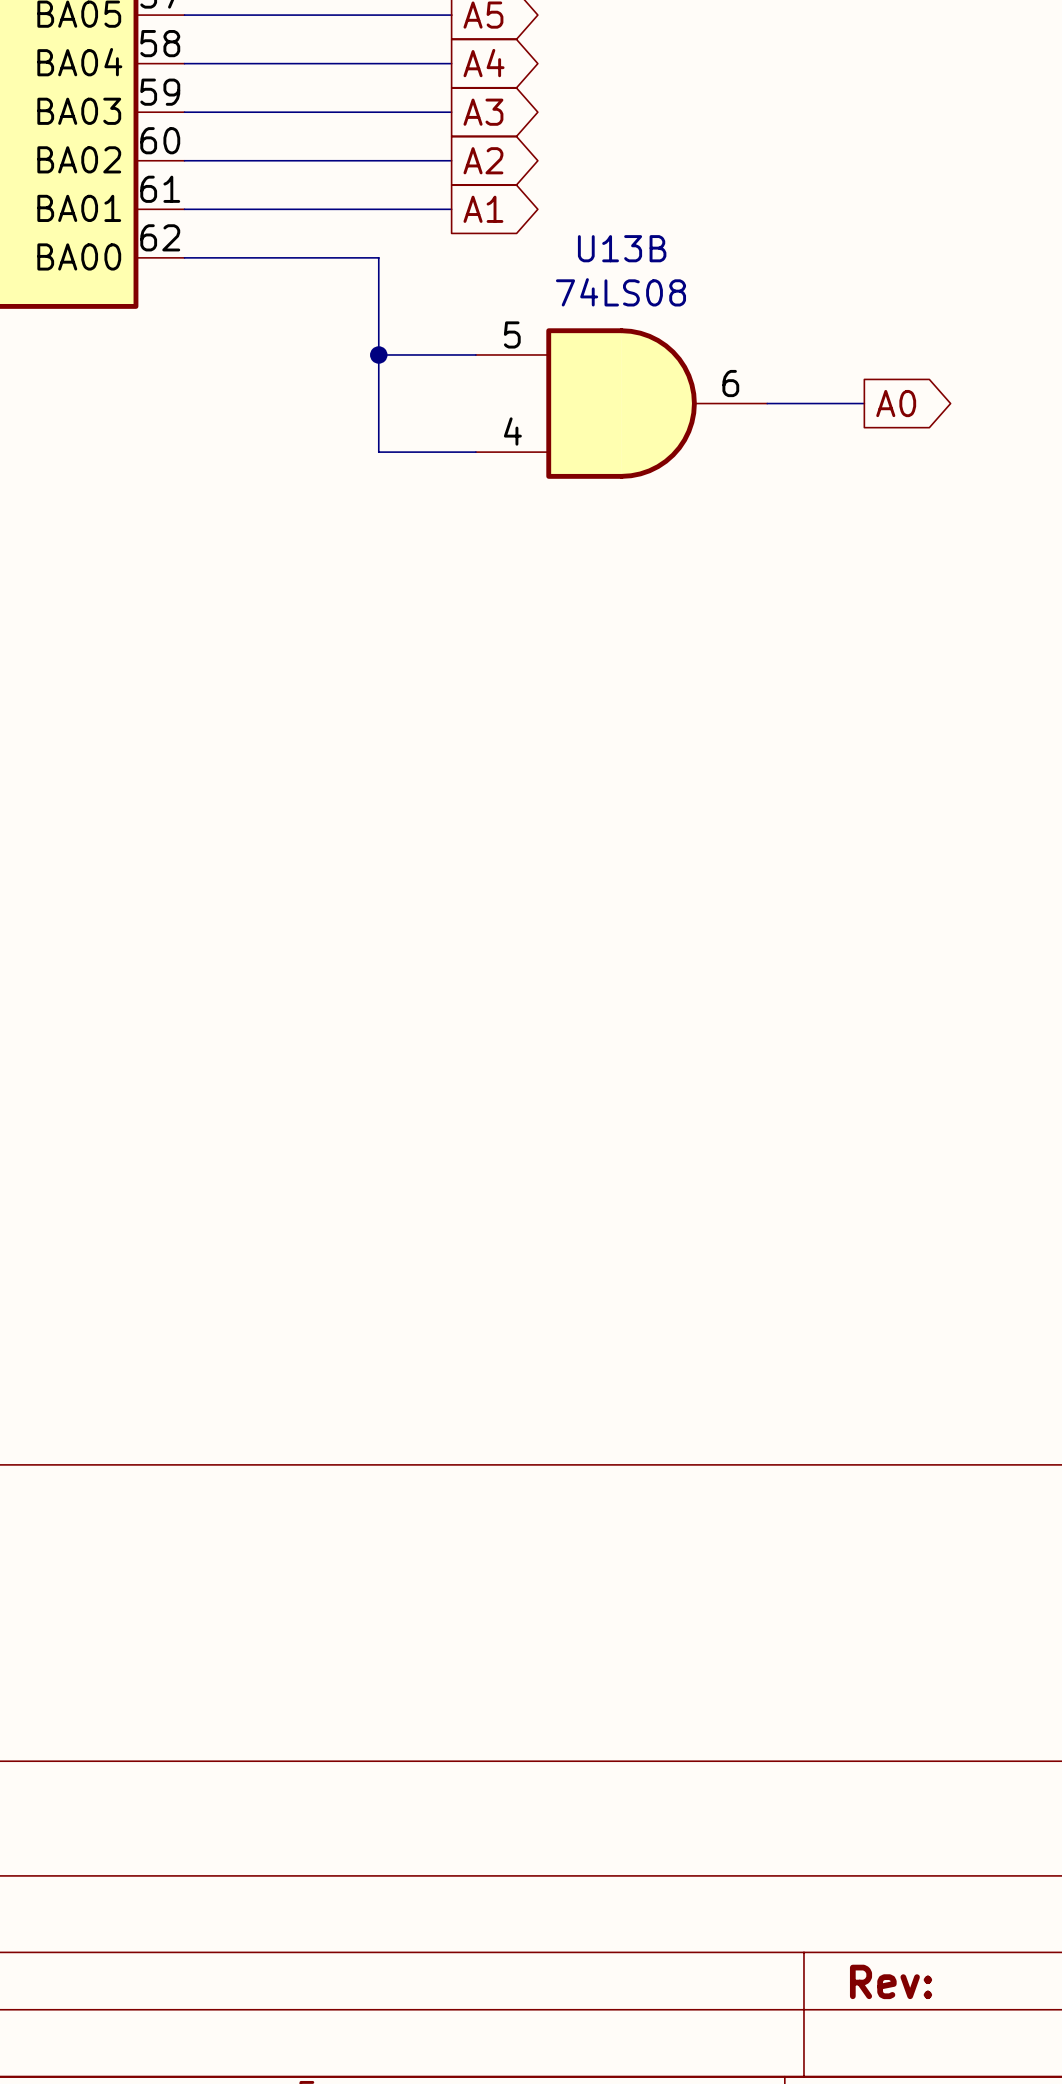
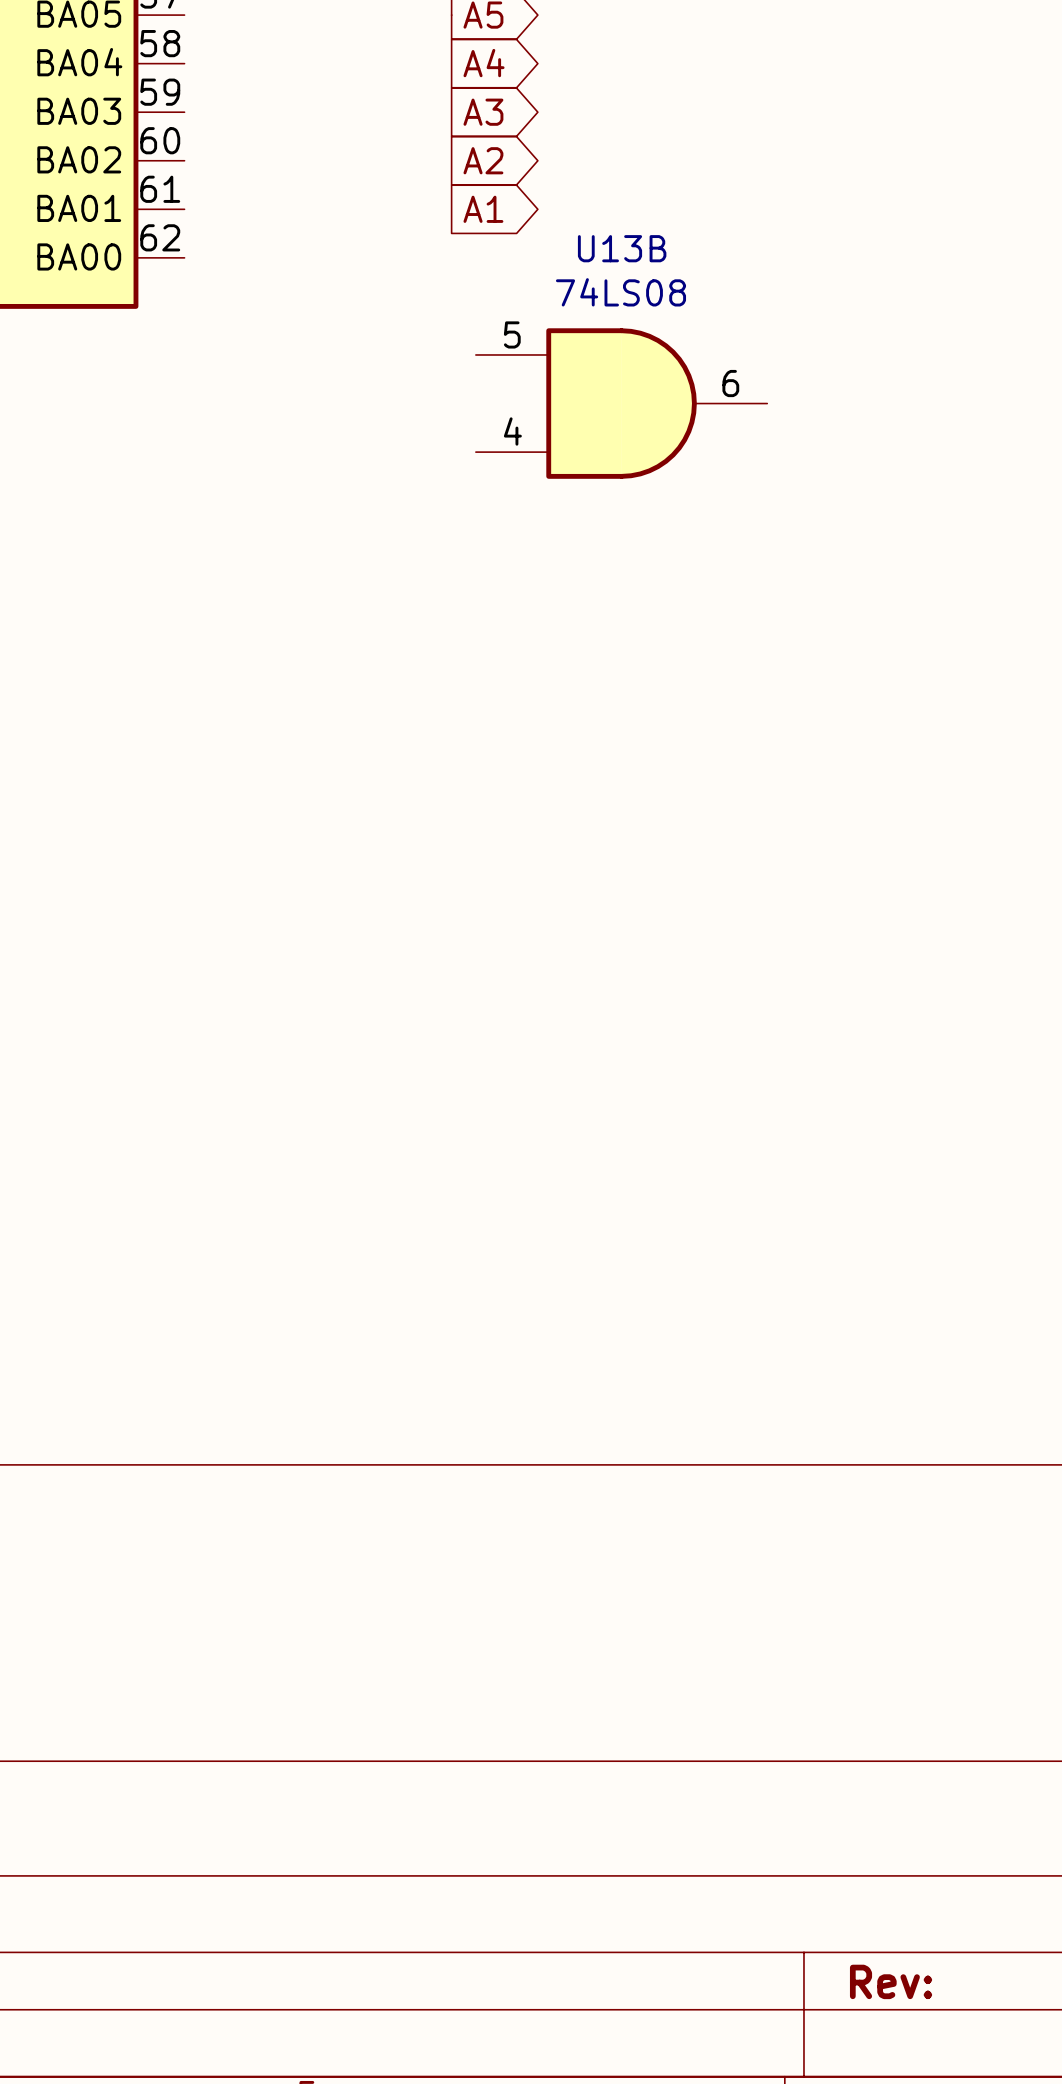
wire: (184, 15) (451, 15) -> none
wire: (184, 63) (451, 63) -> none
wire: (184, 112) (451, 112) -> none
wire: (184, 160) (451, 160) -> none
wire: (184, 209) (451, 209) -> none
wire: (184, 257) (378, 257) (378, 452) (475, 452) -> none
wire: (378, 354) (475, 354) -> none
junction: (378, 354) -> none
wire: (767, 403) (864, 403) -> none
global label: A0 (896, 403) -> none

